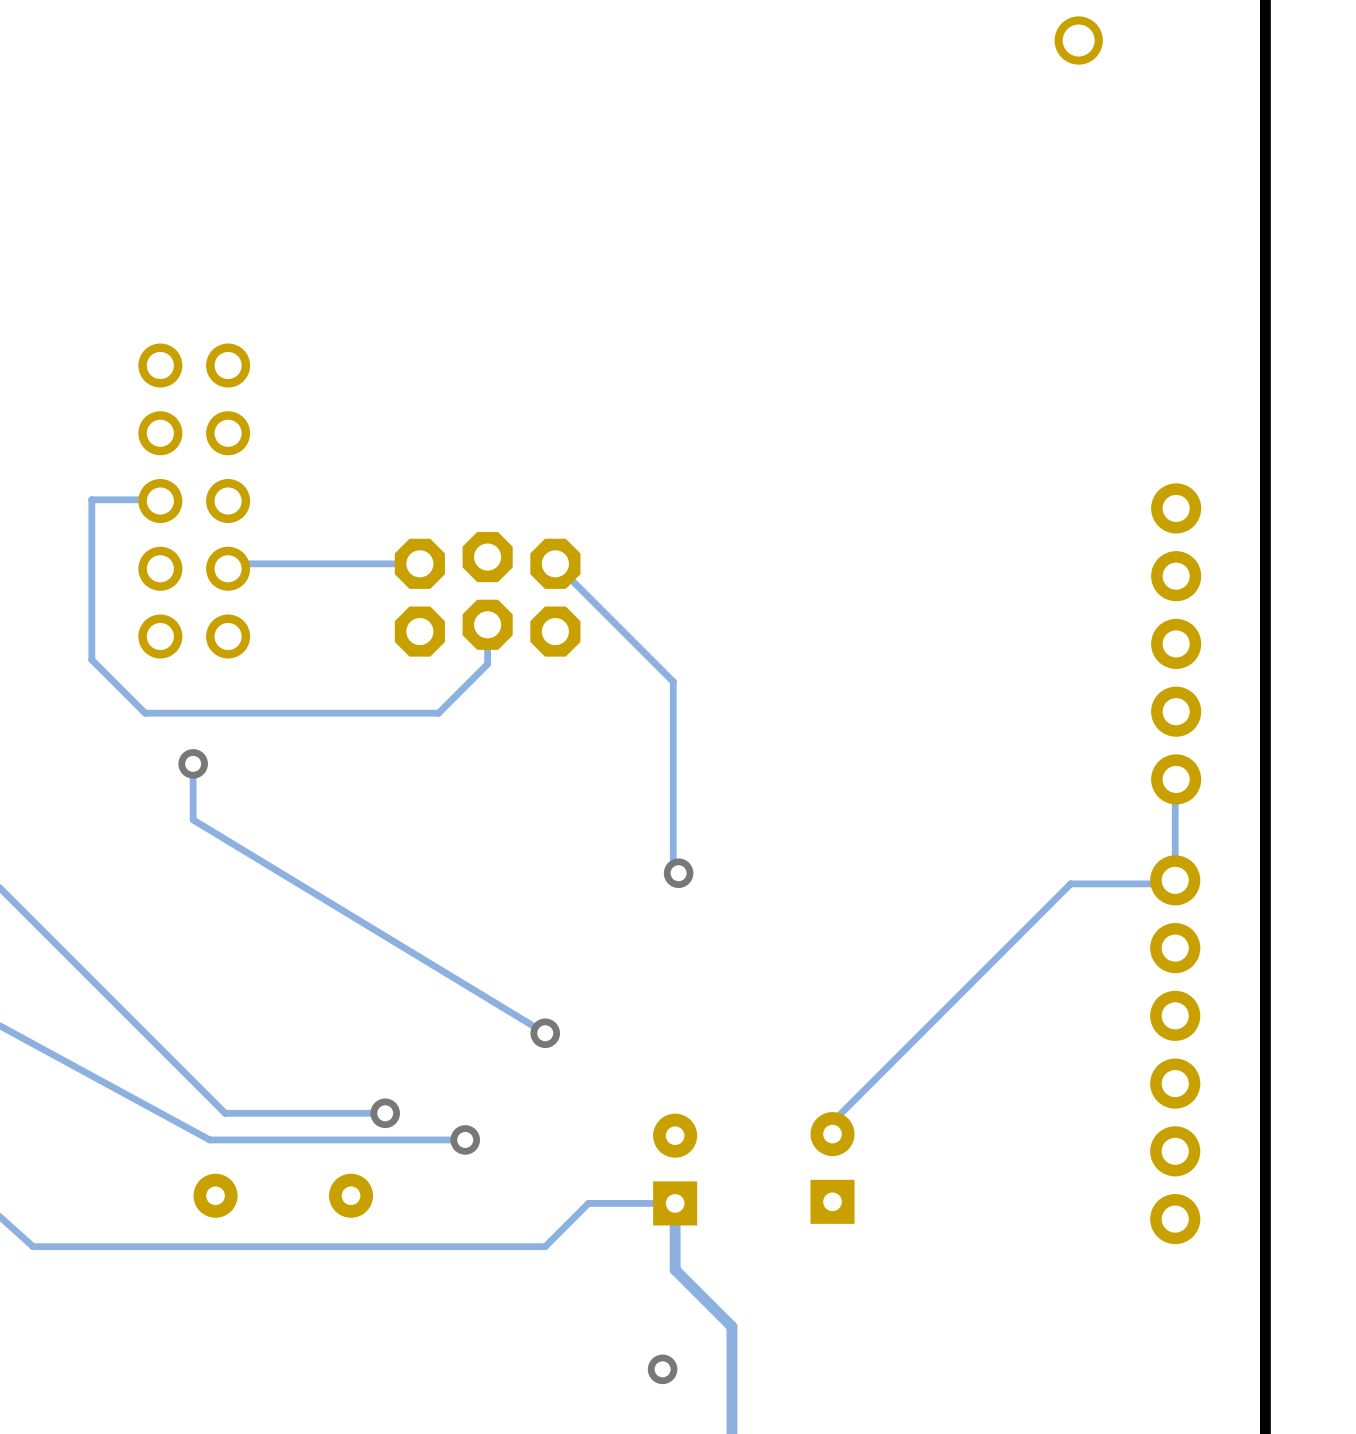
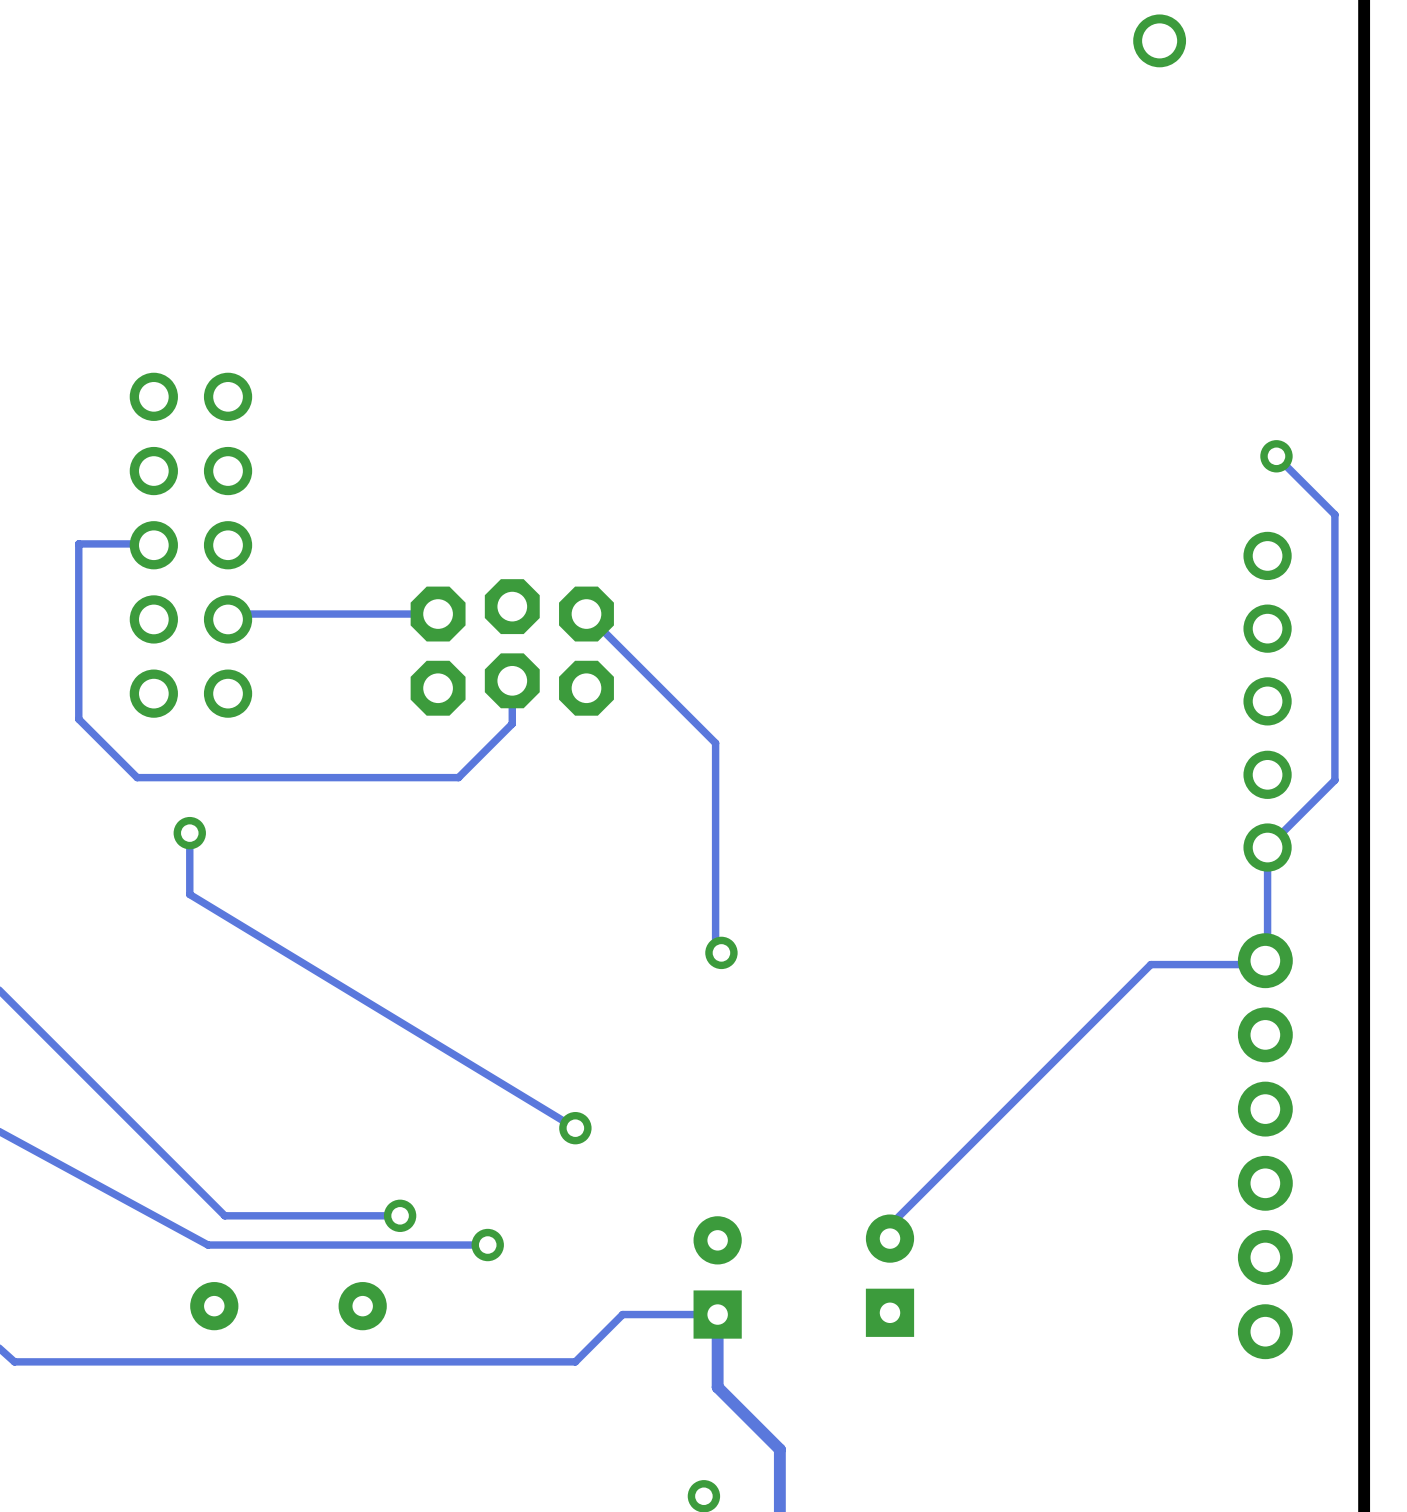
via: none -> (1276, 456)
part footprint: [1151, 483, 1202, 805] -> [1243, 531, 1292, 872]
track: (1176, 779) (1175, 880) -> (1276, 456) (1334, 514) (1334, 780) (1267, 847) (1267, 960) (1265, 960)

